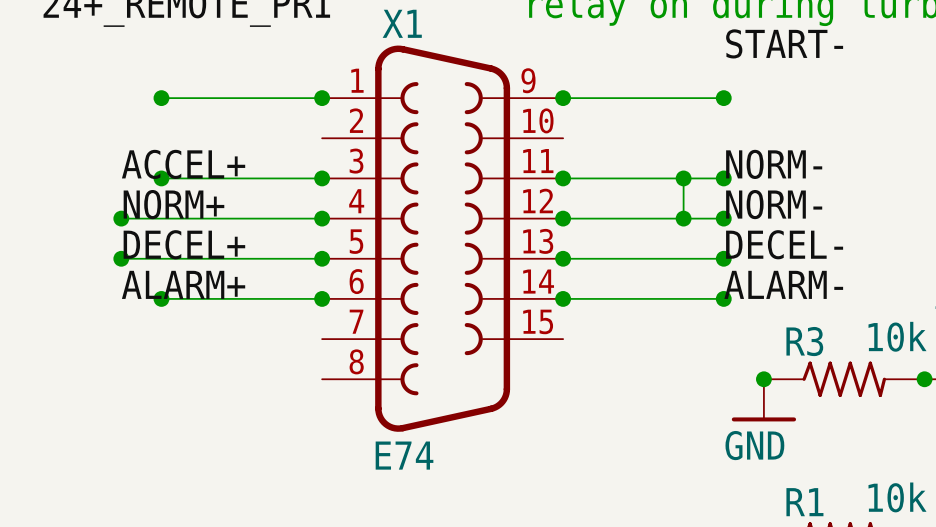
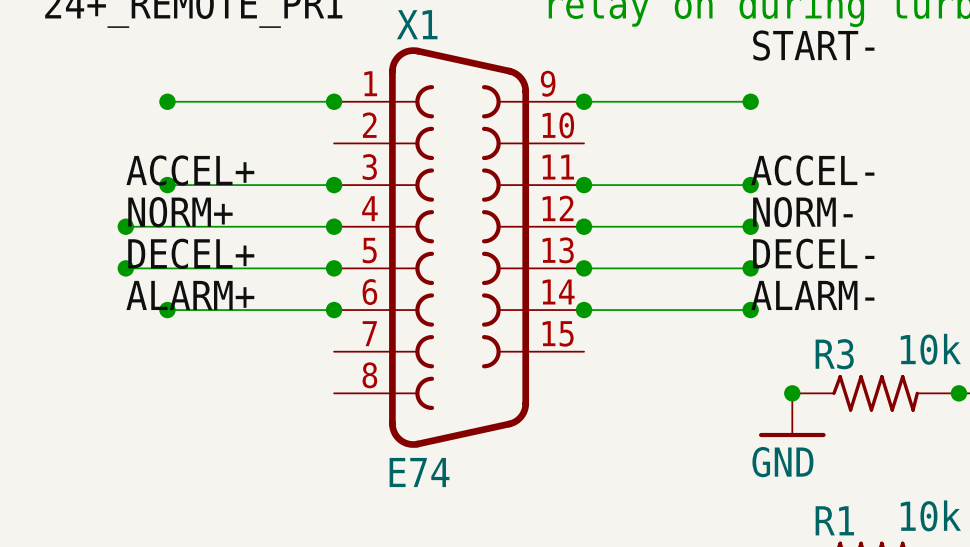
label: NORM- (774, 164) -> ACCEL- (812, 170)
wire: (683, 178) (683, 218) -> none
junction: (683, 178) -> none
junction: (683, 218) -> none

